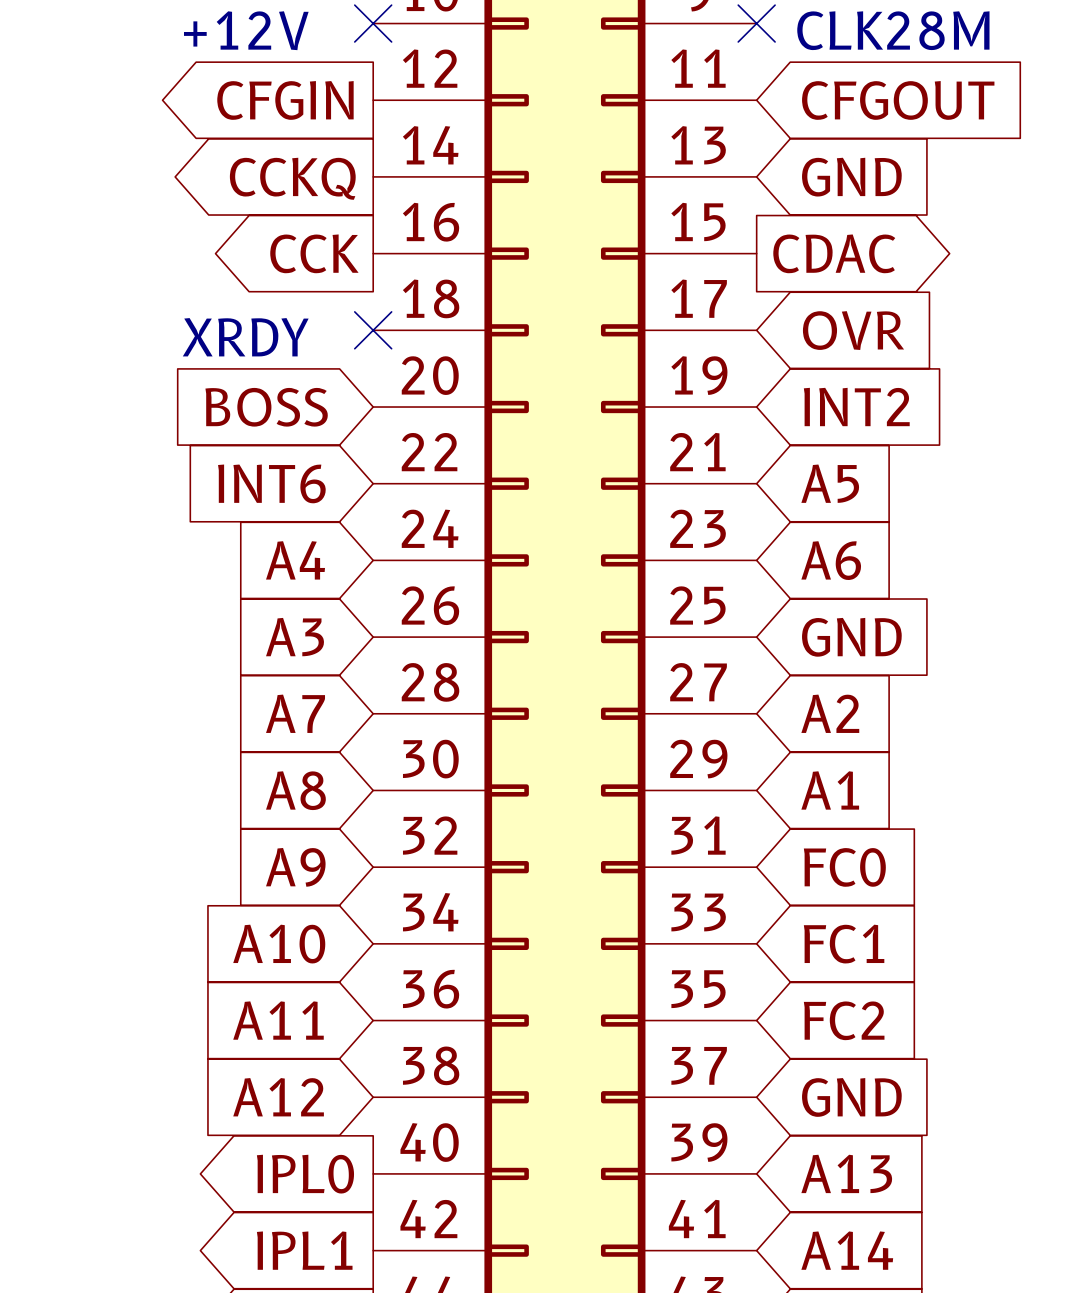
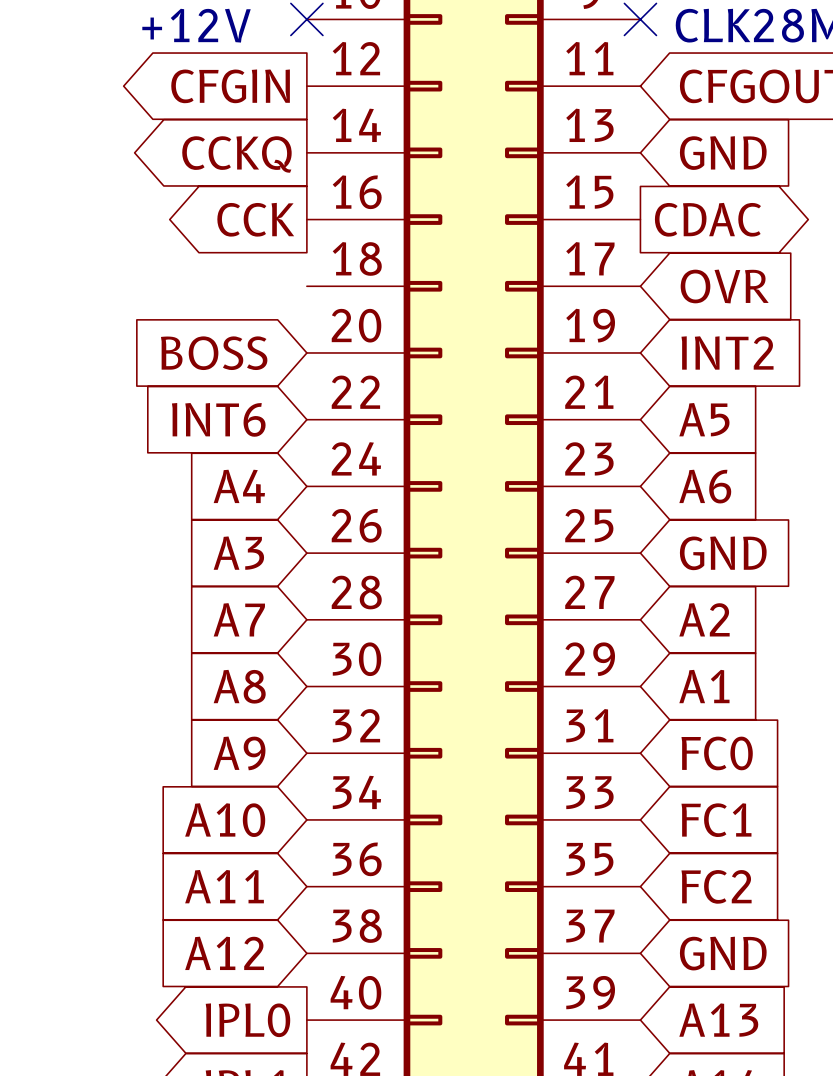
no-connect mark: (373, 330) -> none
text: XRDY (245, 337) -> none

